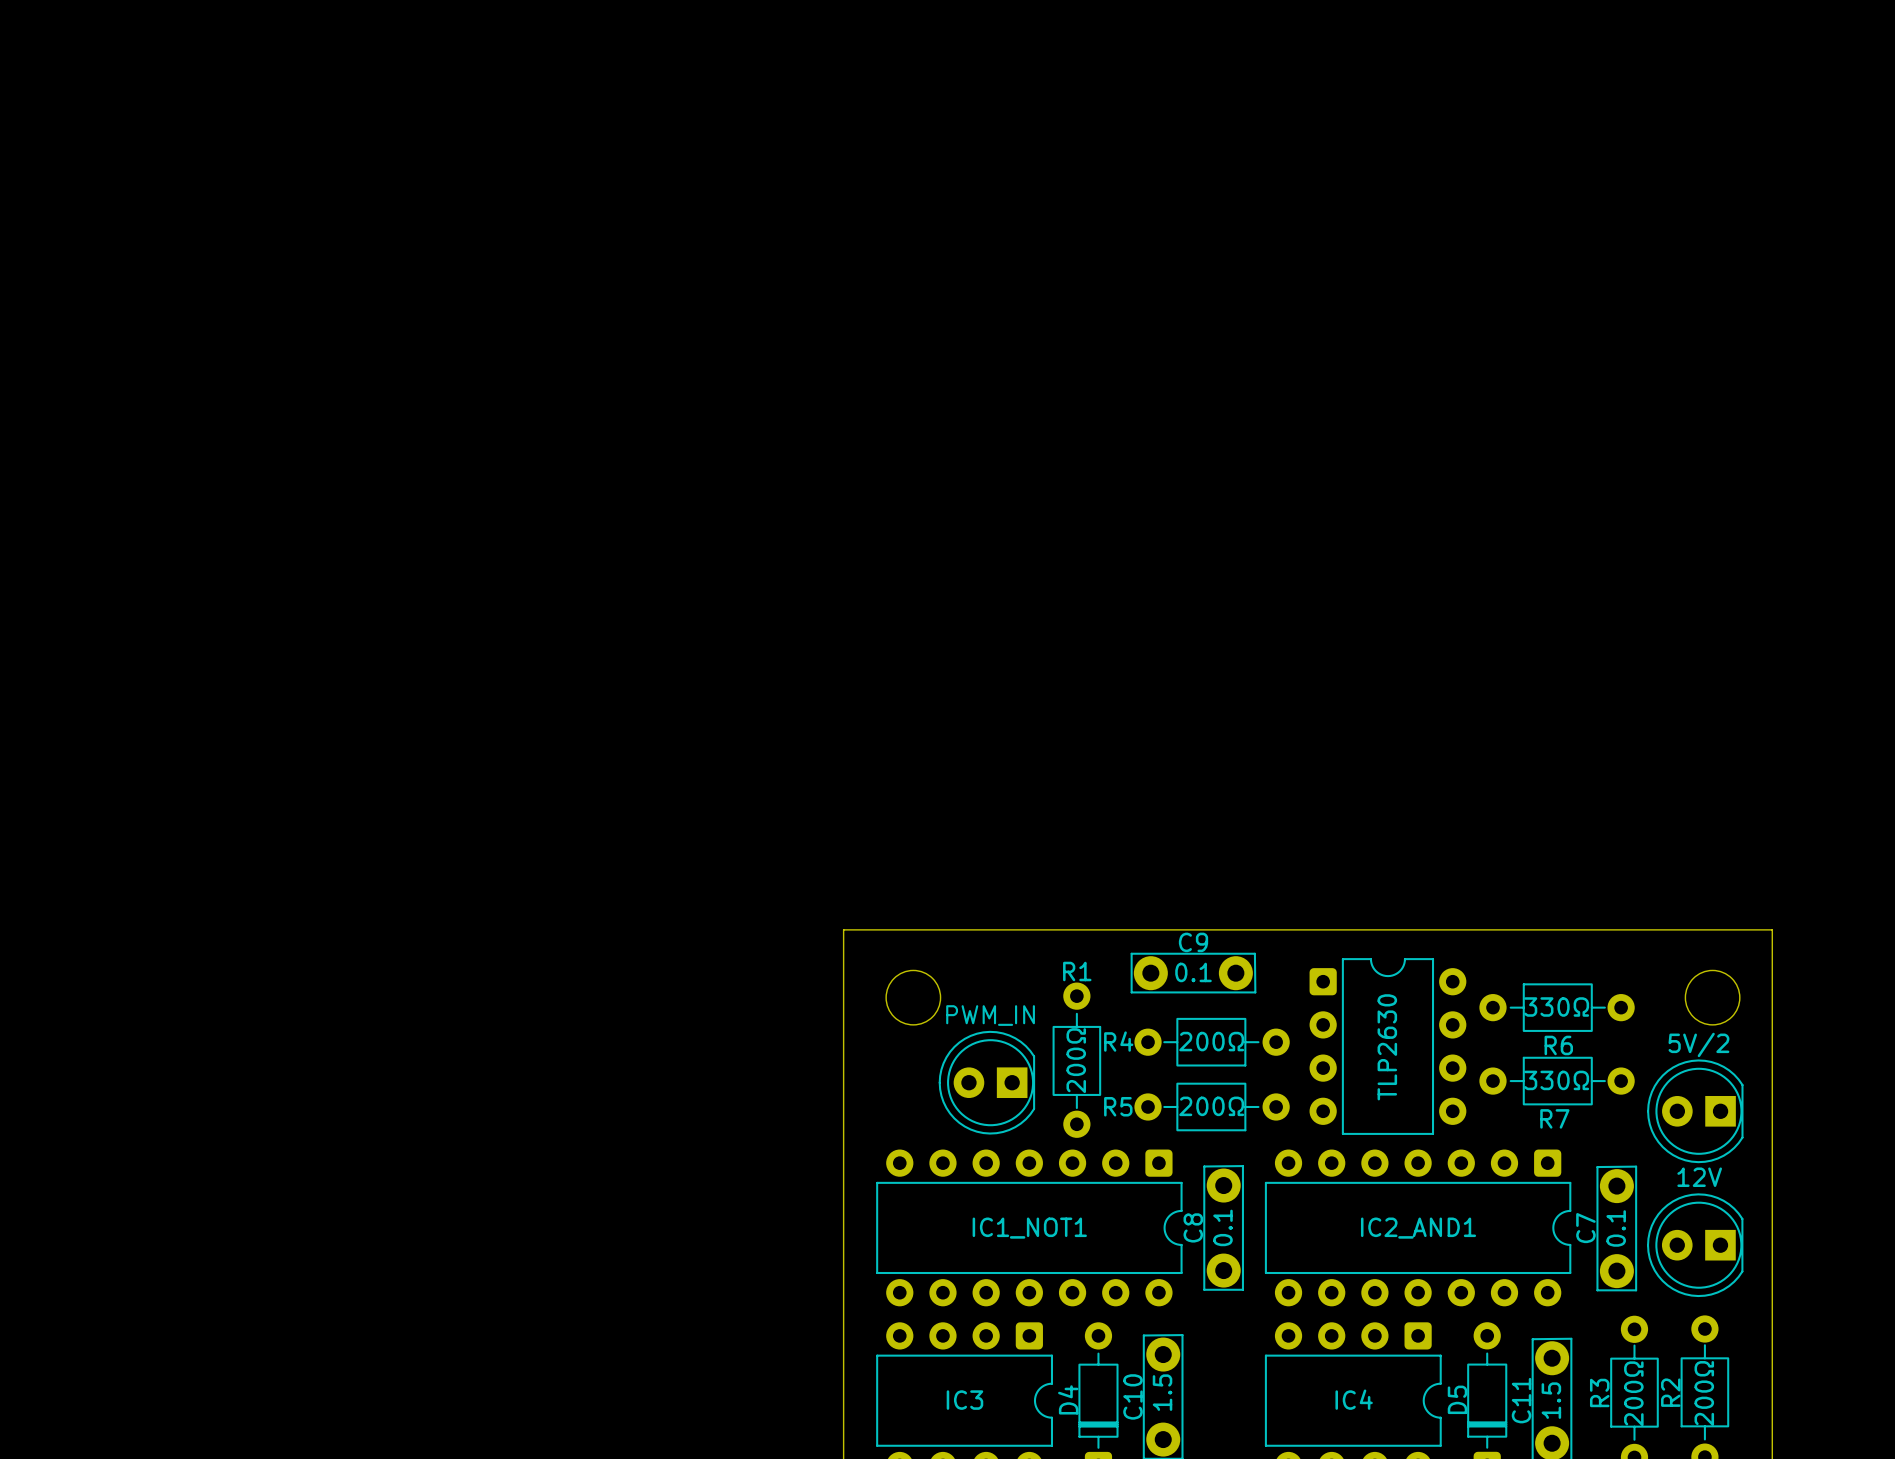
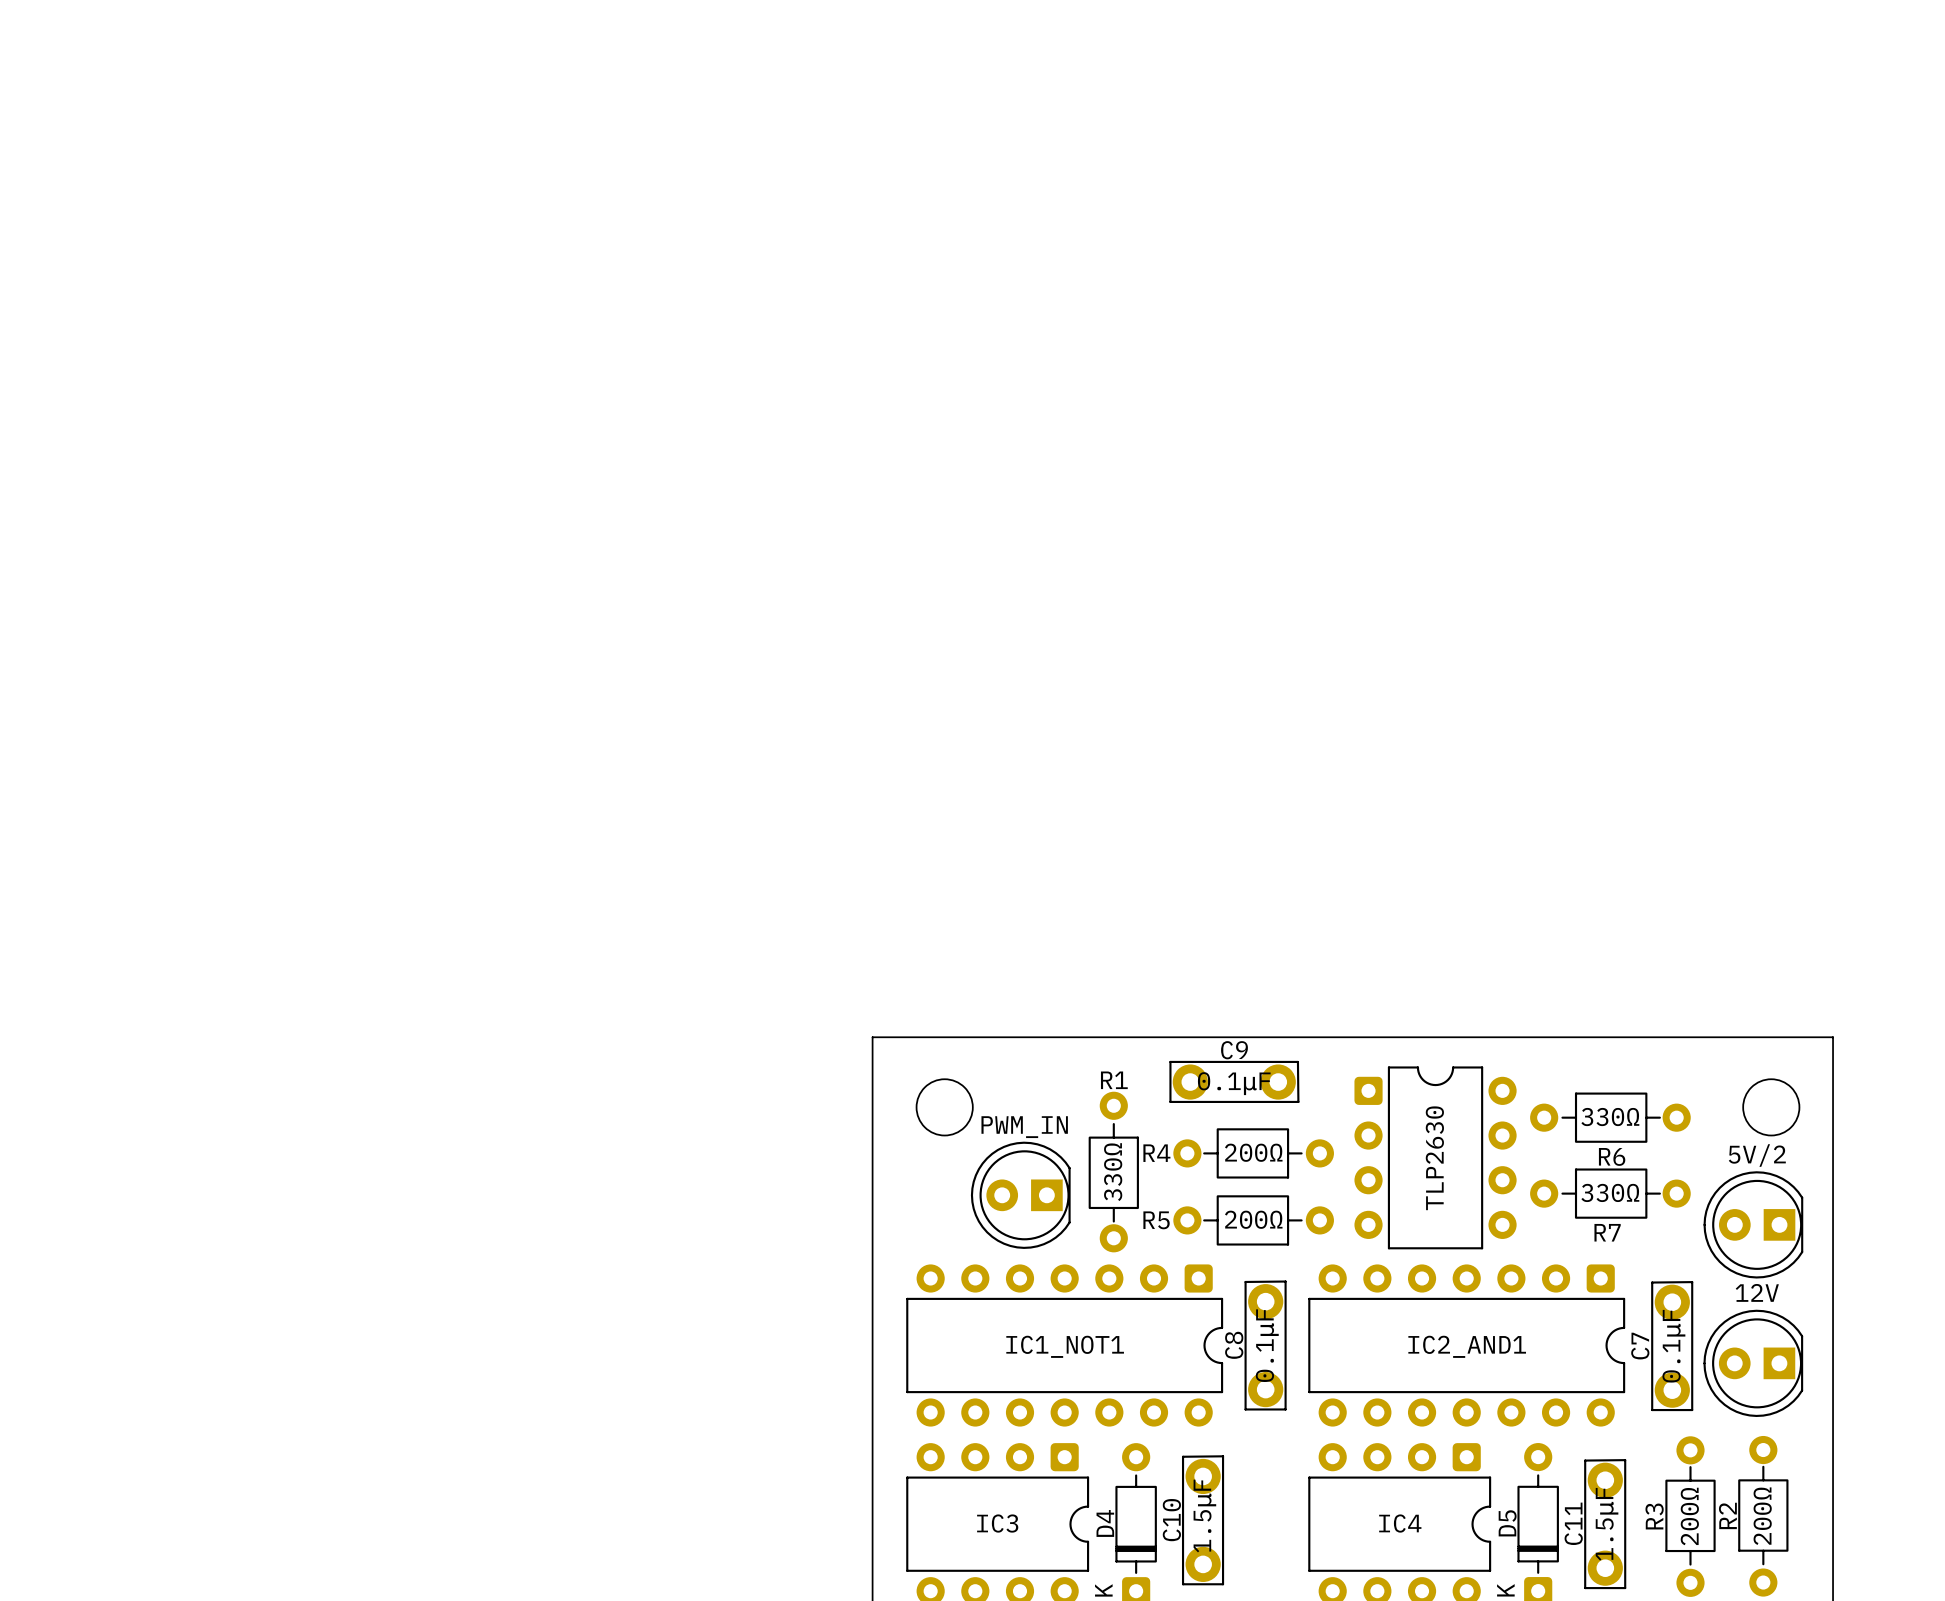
C9 value: 0.1 (1193, 972) -> 0.1μF (1234, 1083)
R1 value: 200Ω (1076, 1060) -> 330Ω (1113, 1172)
C8 value: 0.1 (1222, 1227) -> 0.1μF (1267, 1345)
C7 value: 0.1 (1616, 1228) -> 0.1μF (1673, 1346)
C10 value: 1.5 (1162, 1392) -> 1.5μF (1204, 1516)
C11 value: 1.5 (1551, 1400) -> 1.5μF (1607, 1524)

